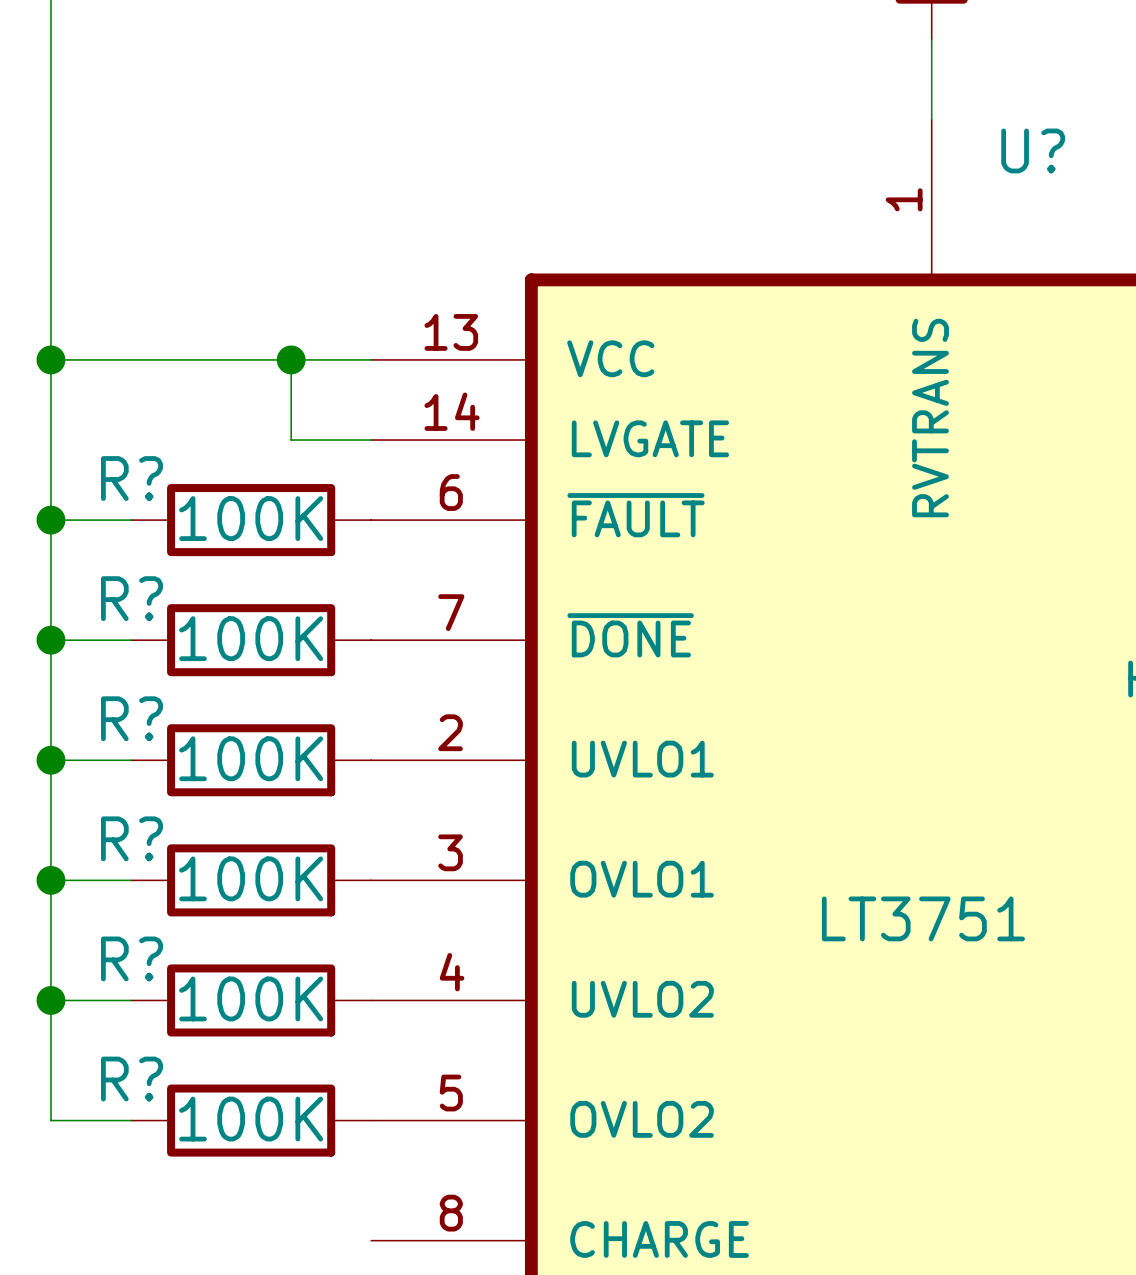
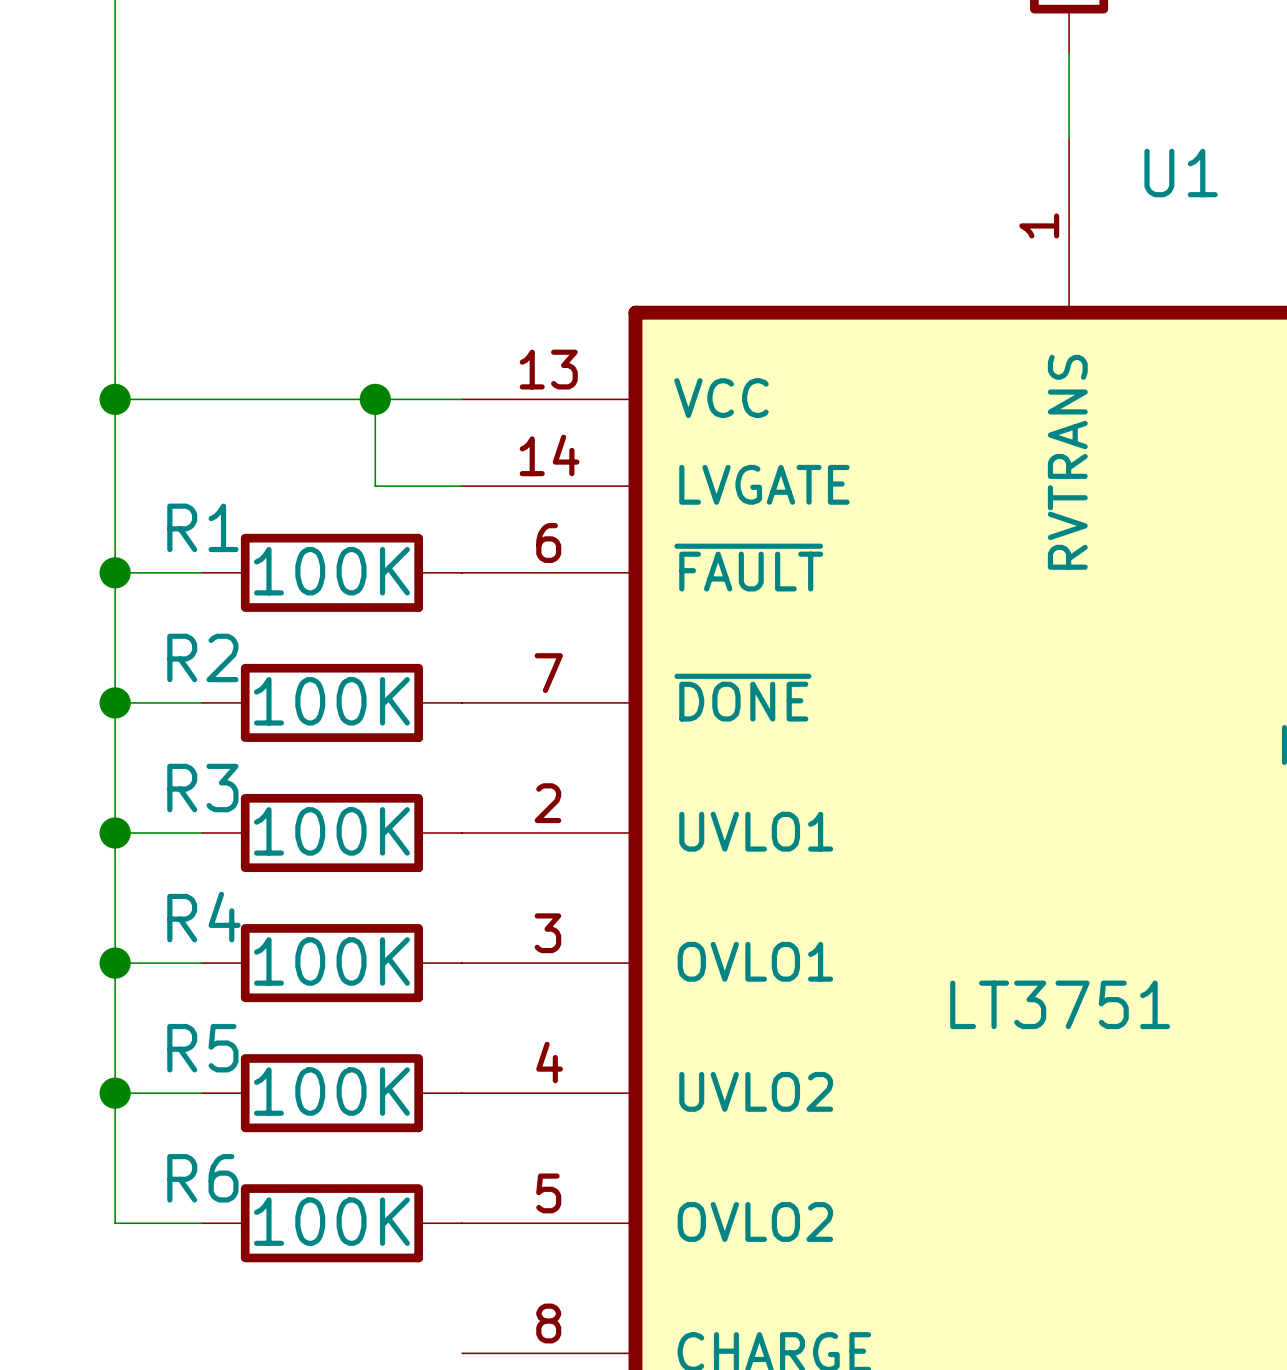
U? name: U? (1033, 150) -> U1 (1181, 173)
R? name: R? (132, 478) -> R1 (202, 527)
R? name: R? (132, 598) -> R2 (202, 657)
R? name: R? (132, 718) -> R3 (202, 788)
R? name: R? (132, 838) -> R4 (203, 917)
R? name: R? (132, 958) -> R5 (202, 1048)
R? name: R? (132, 1079) -> R6 (202, 1178)

